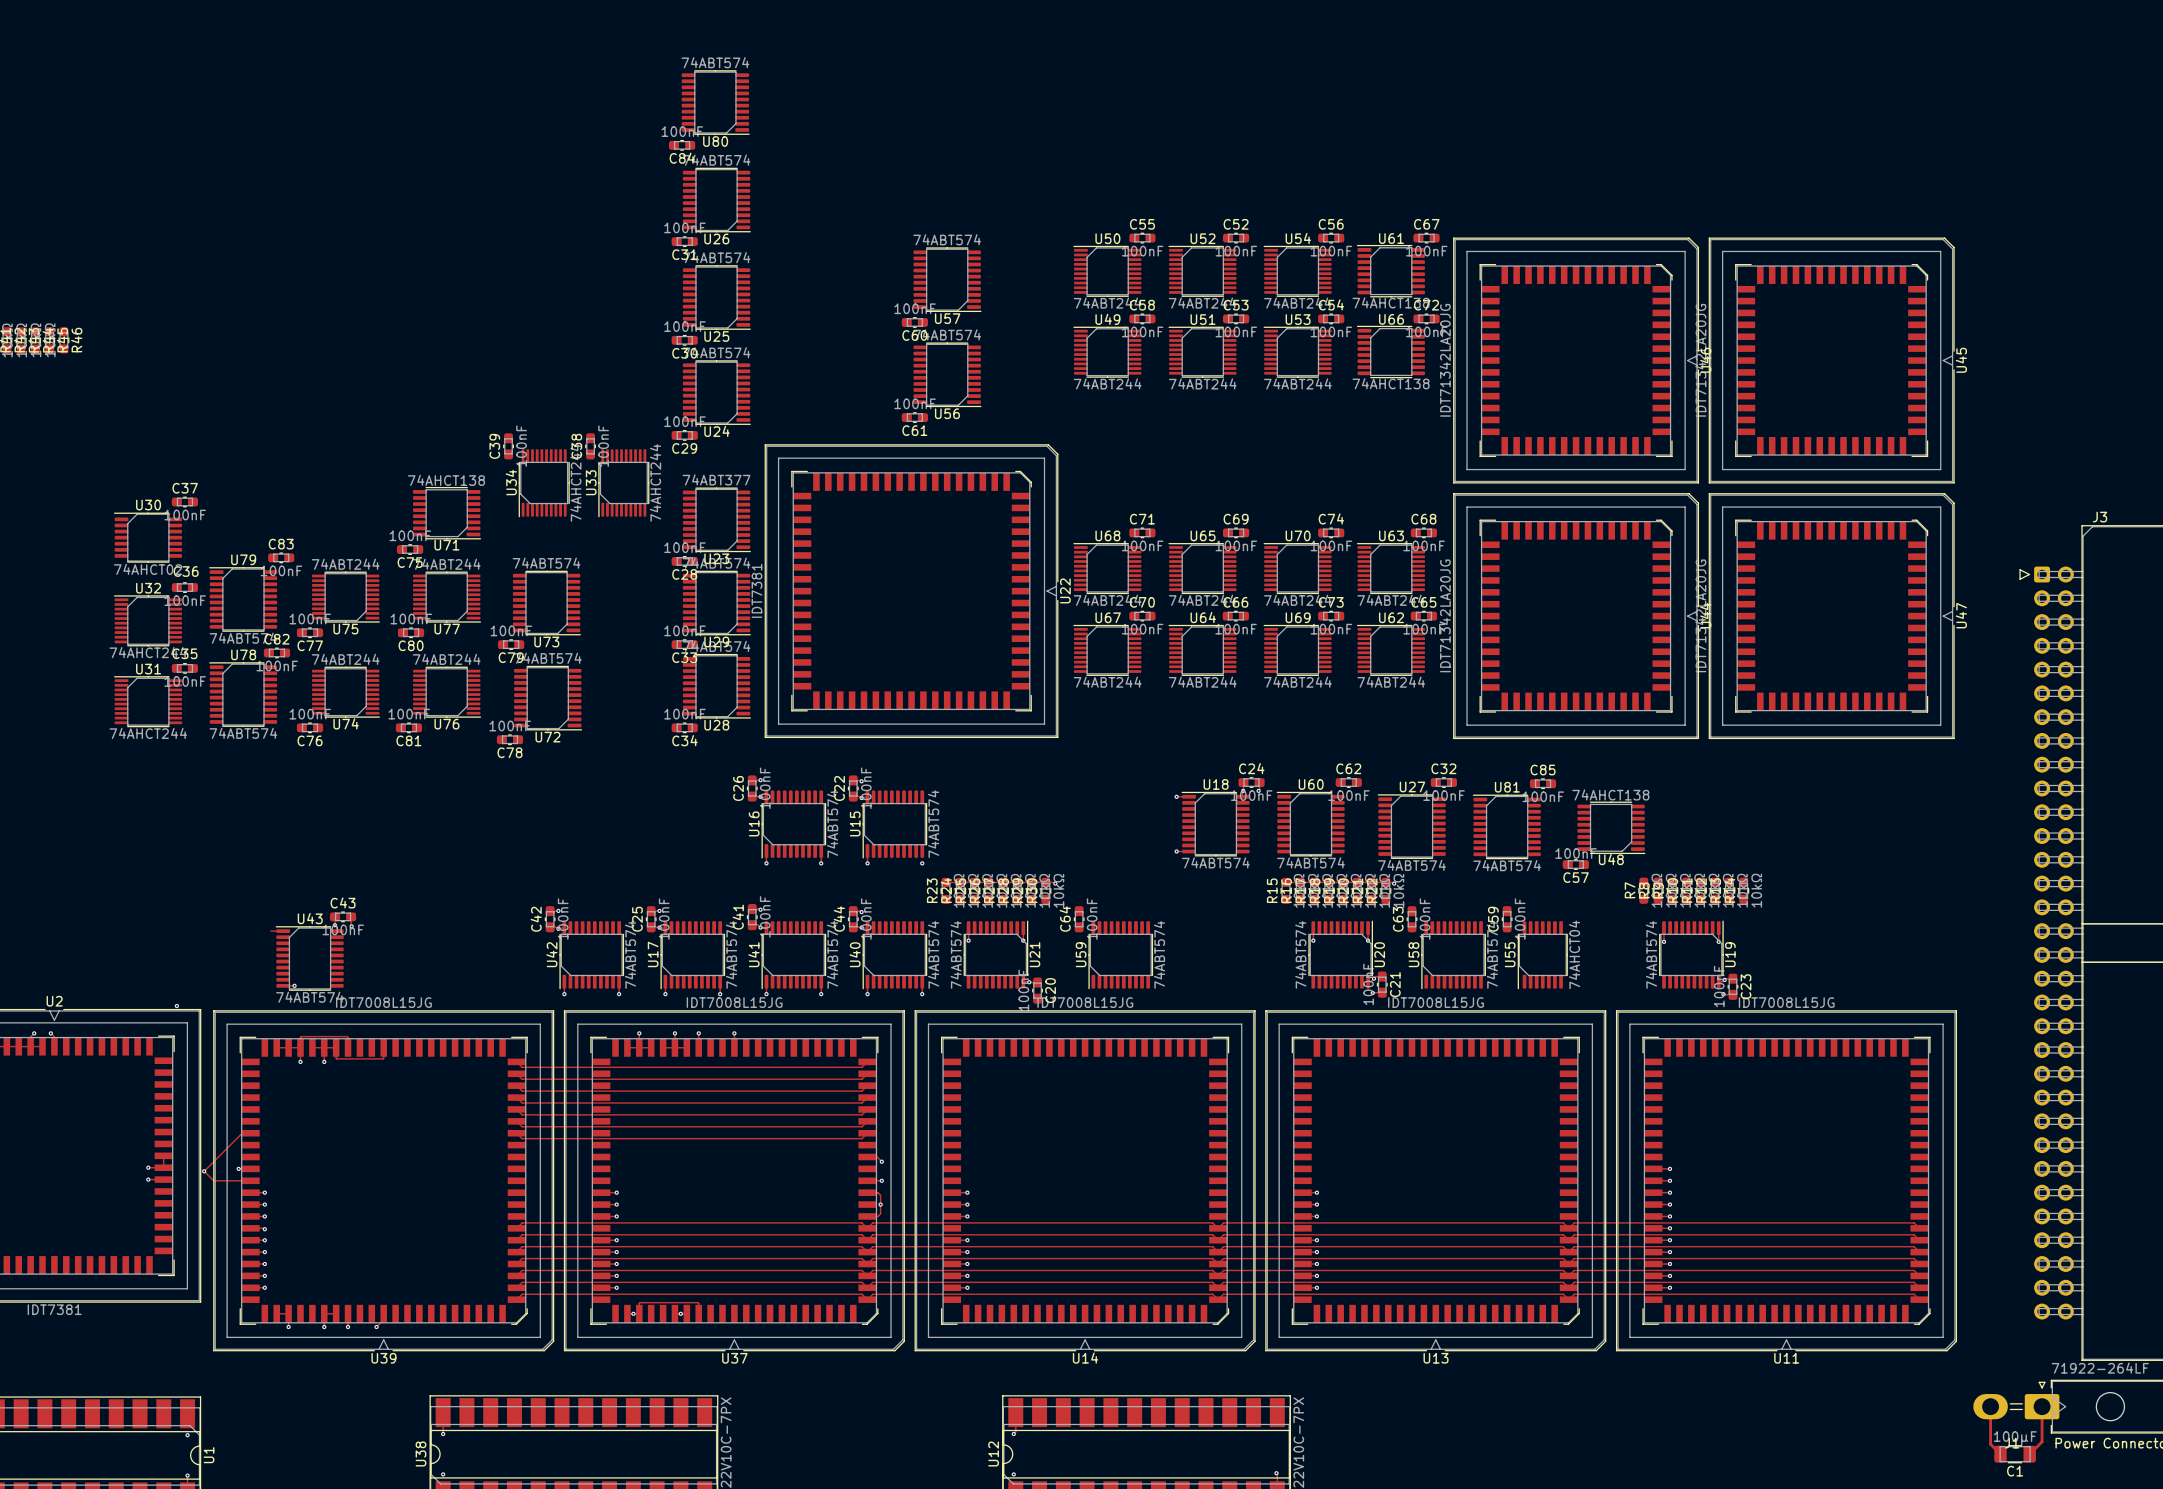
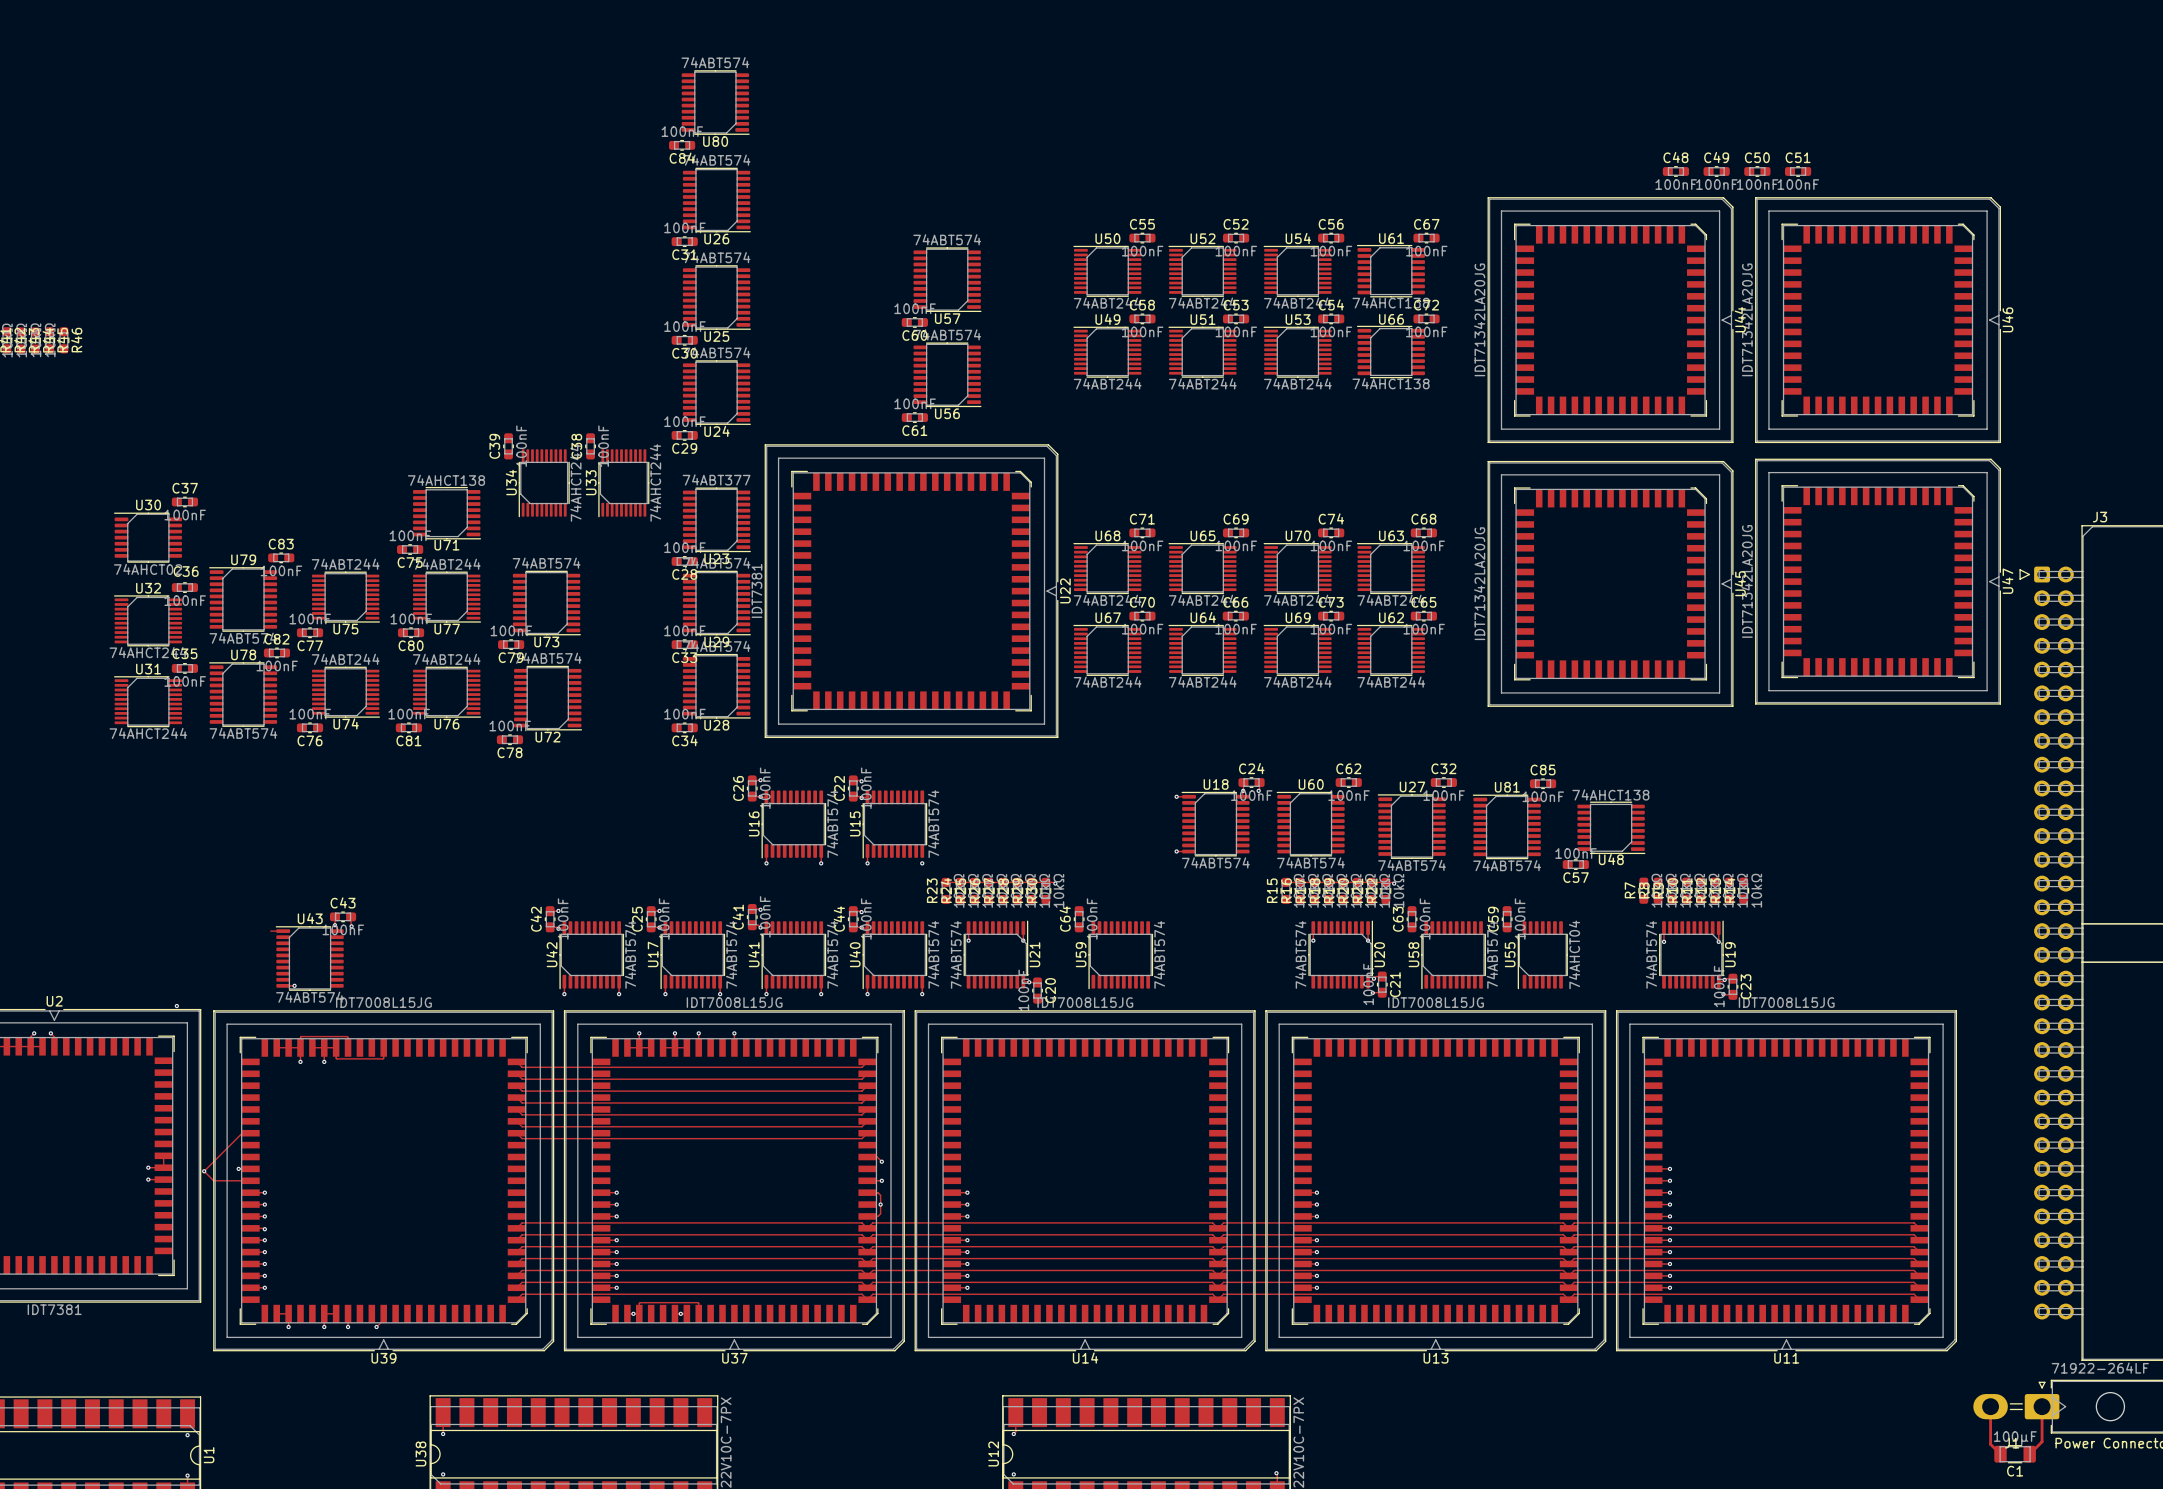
C48: none -> 100nF (1675, 171)
C49: none -> 100nF (1716, 171)
C50: none -> 100nF (1757, 171)
C51: none -> 100nF (1798, 171)
U46 position: (1576, 360) -> (1878, 320)
U45 position: (1831, 360) -> (1610, 583)
U44 position: (1576, 616) -> (1610, 320)
U47 position: (1831, 616) -> (1878, 581)

